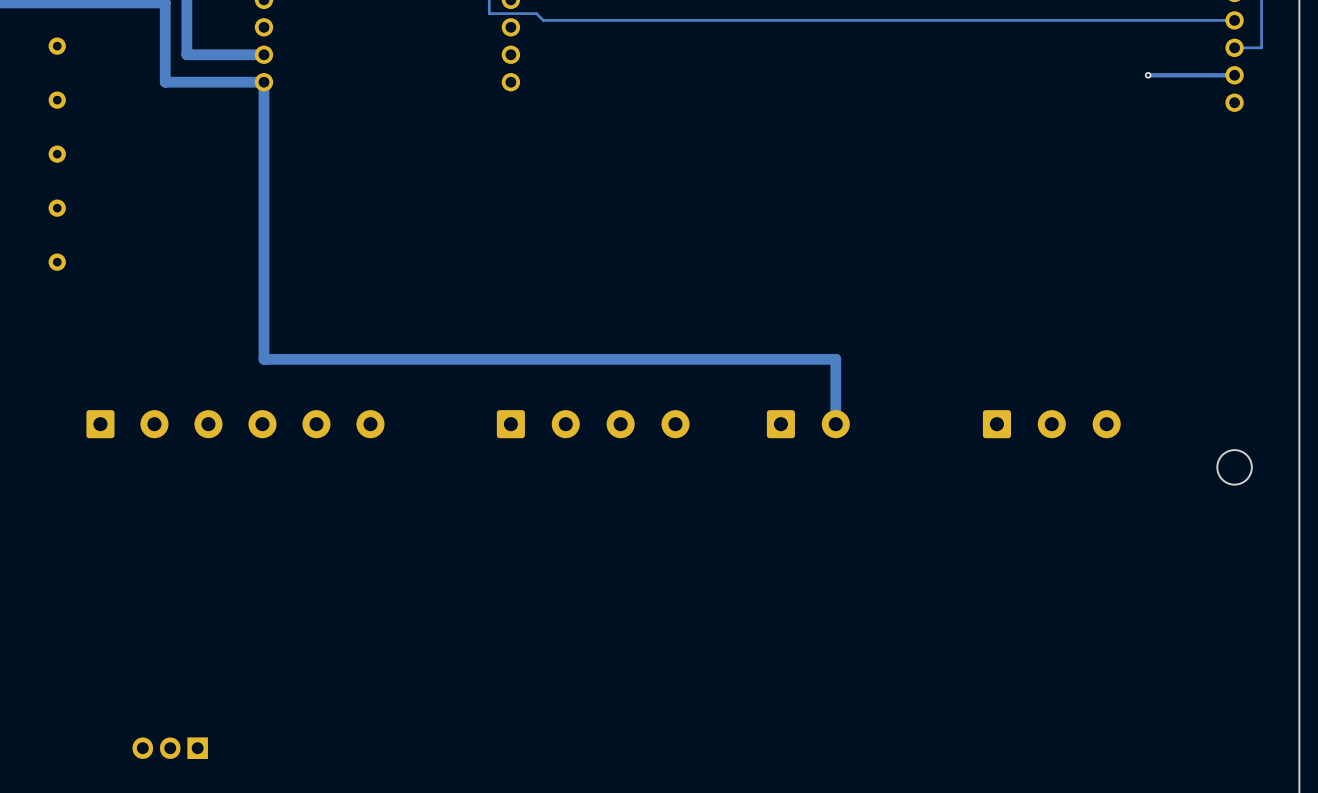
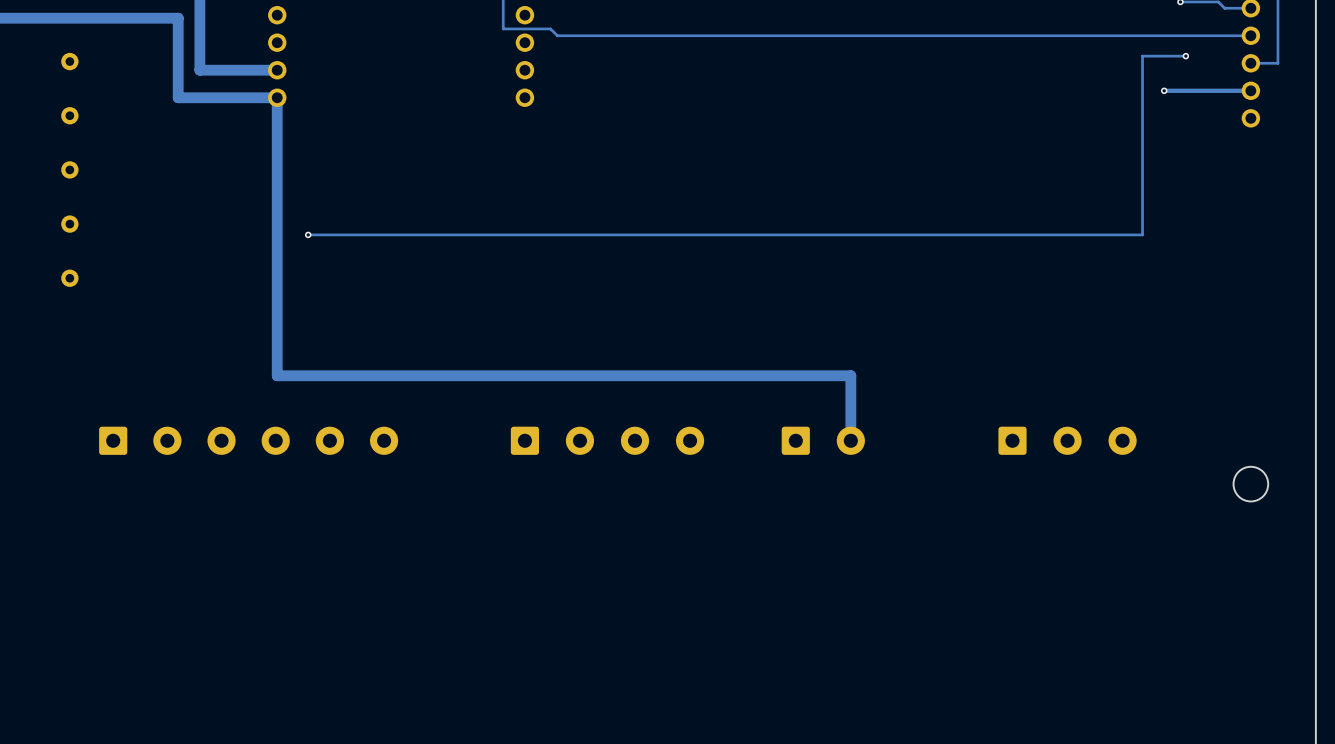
track: none -> (1185, 56) (1142, 56) (1142, 234) (308, 234)
via: none -> (1185, 56)
via: none -> (308, 234)

